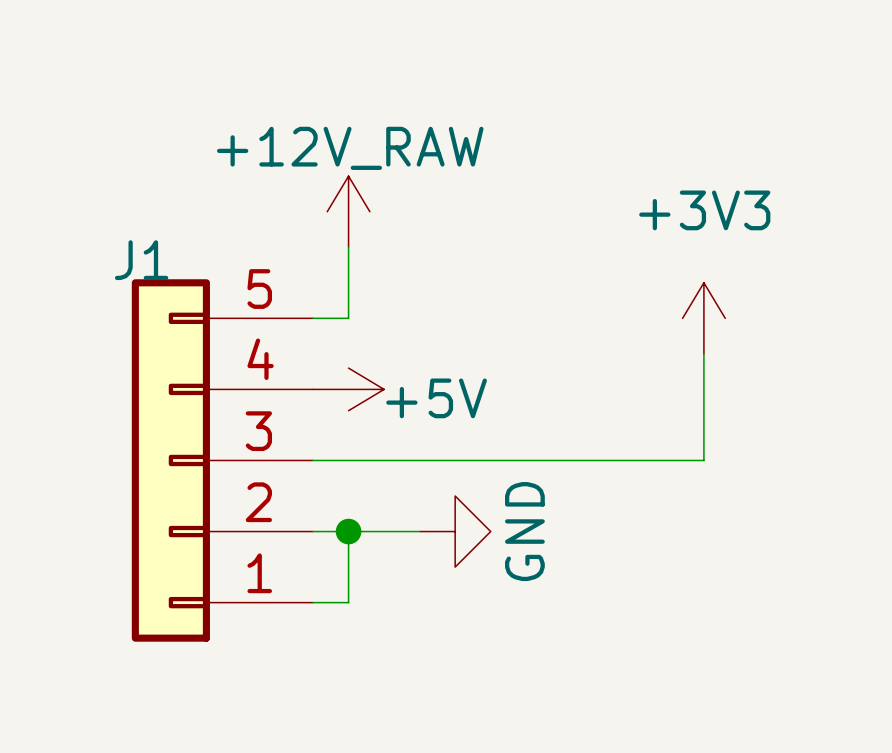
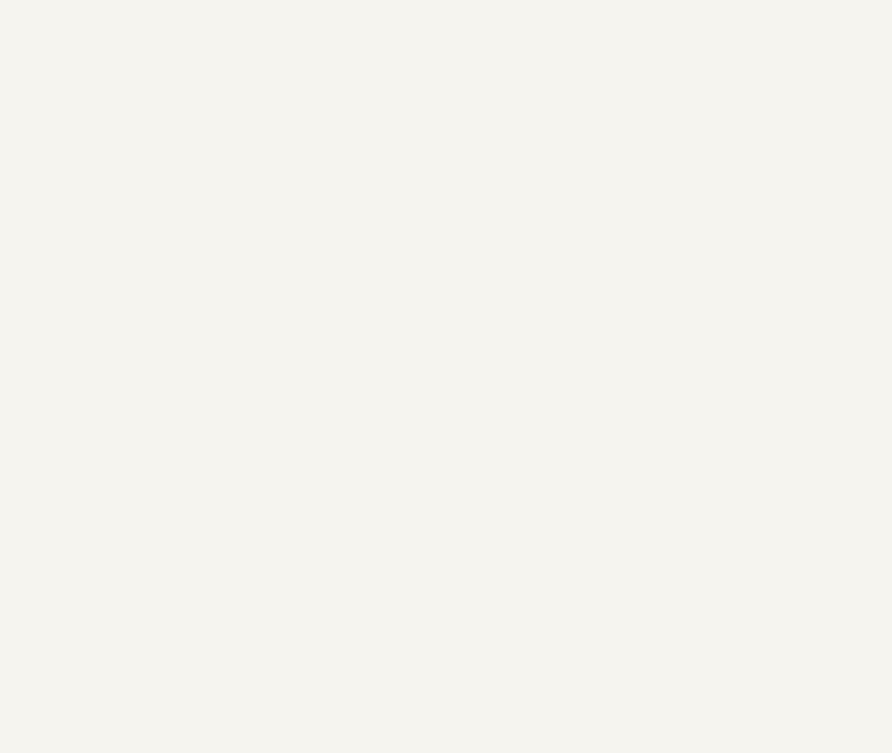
power symbol: +12V_RAW (348, 211) -> none
wire: (348, 247) (348, 318) (313, 318) -> none
power symbol: +3V3 (703, 318) -> none
wire: (703, 353) (703, 460) (313, 460) -> none
power symbol: +5V (348, 389) -> none
J1: (222, 460) -> none
wire: (313, 531) (419, 531) -> none
wire: (348, 531) (348, 602) (313, 602) -> none
junction: (348, 531) -> none
power symbol: GND (455, 531) -> none

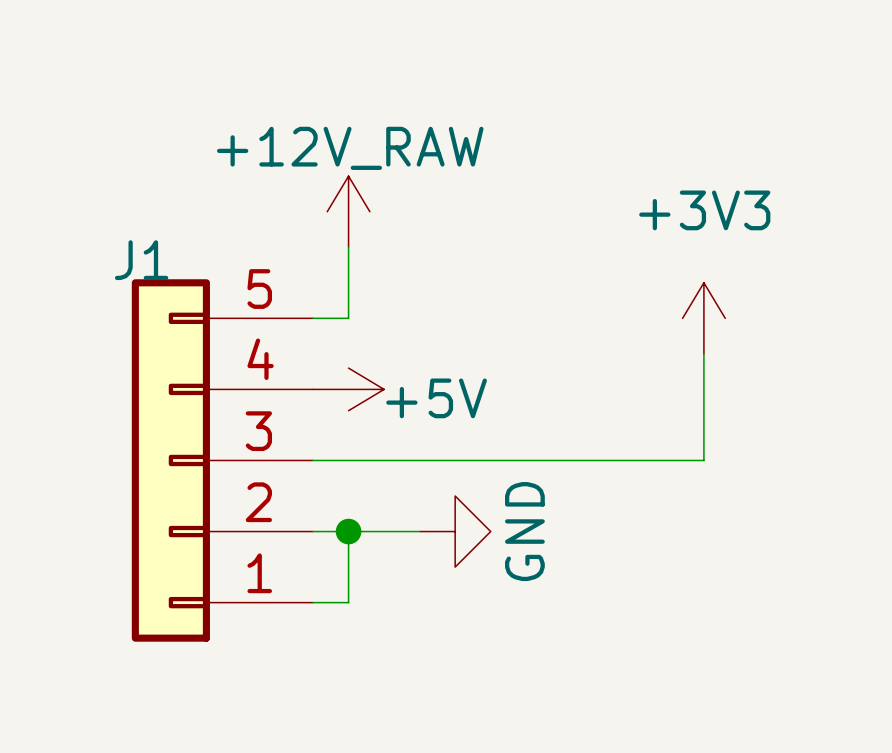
power symbol: none -> +12V_RAW (348, 211)
wire: none -> (348, 247) (348, 318) (313, 318)
power symbol: none -> +3V3 (703, 318)
wire: none -> (703, 353) (703, 460) (313, 460)
power symbol: none -> +5V (348, 389)
J1: none -> (222, 460)
wire: none -> (313, 531) (419, 531)
wire: none -> (348, 531) (348, 602) (313, 602)
junction: none -> (348, 531)
power symbol: none -> GND (455, 531)

